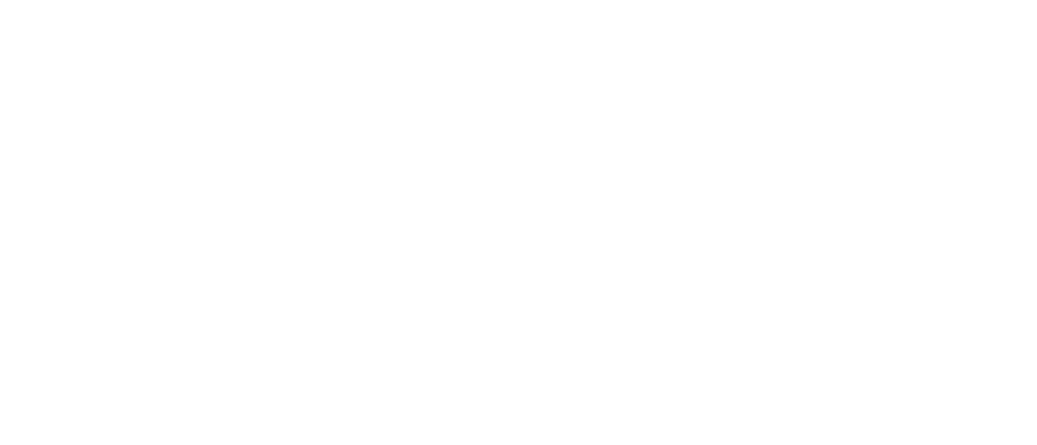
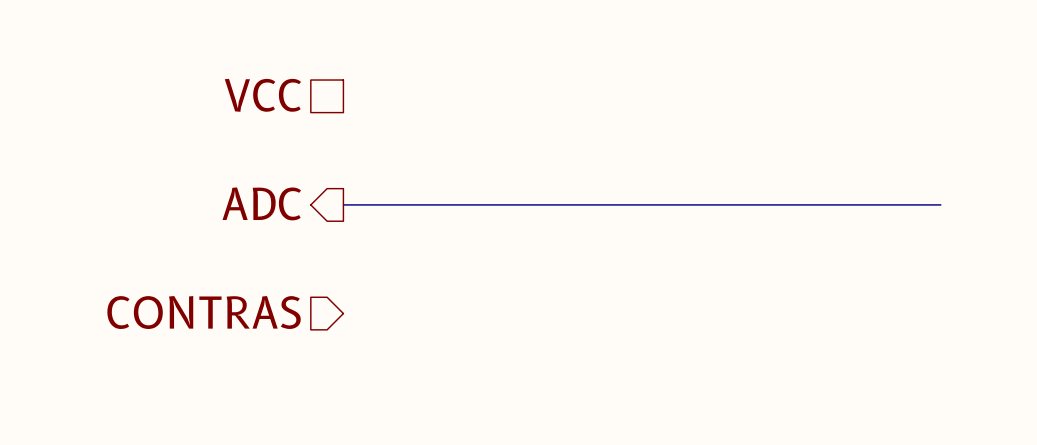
hierarchical label: none -> VCC (262, 95)
hierarchical label: none -> ADC (261, 203)
bus: none -> (343, 204) (940, 204)
hierarchical label: none -> CONTRAS (204, 312)

